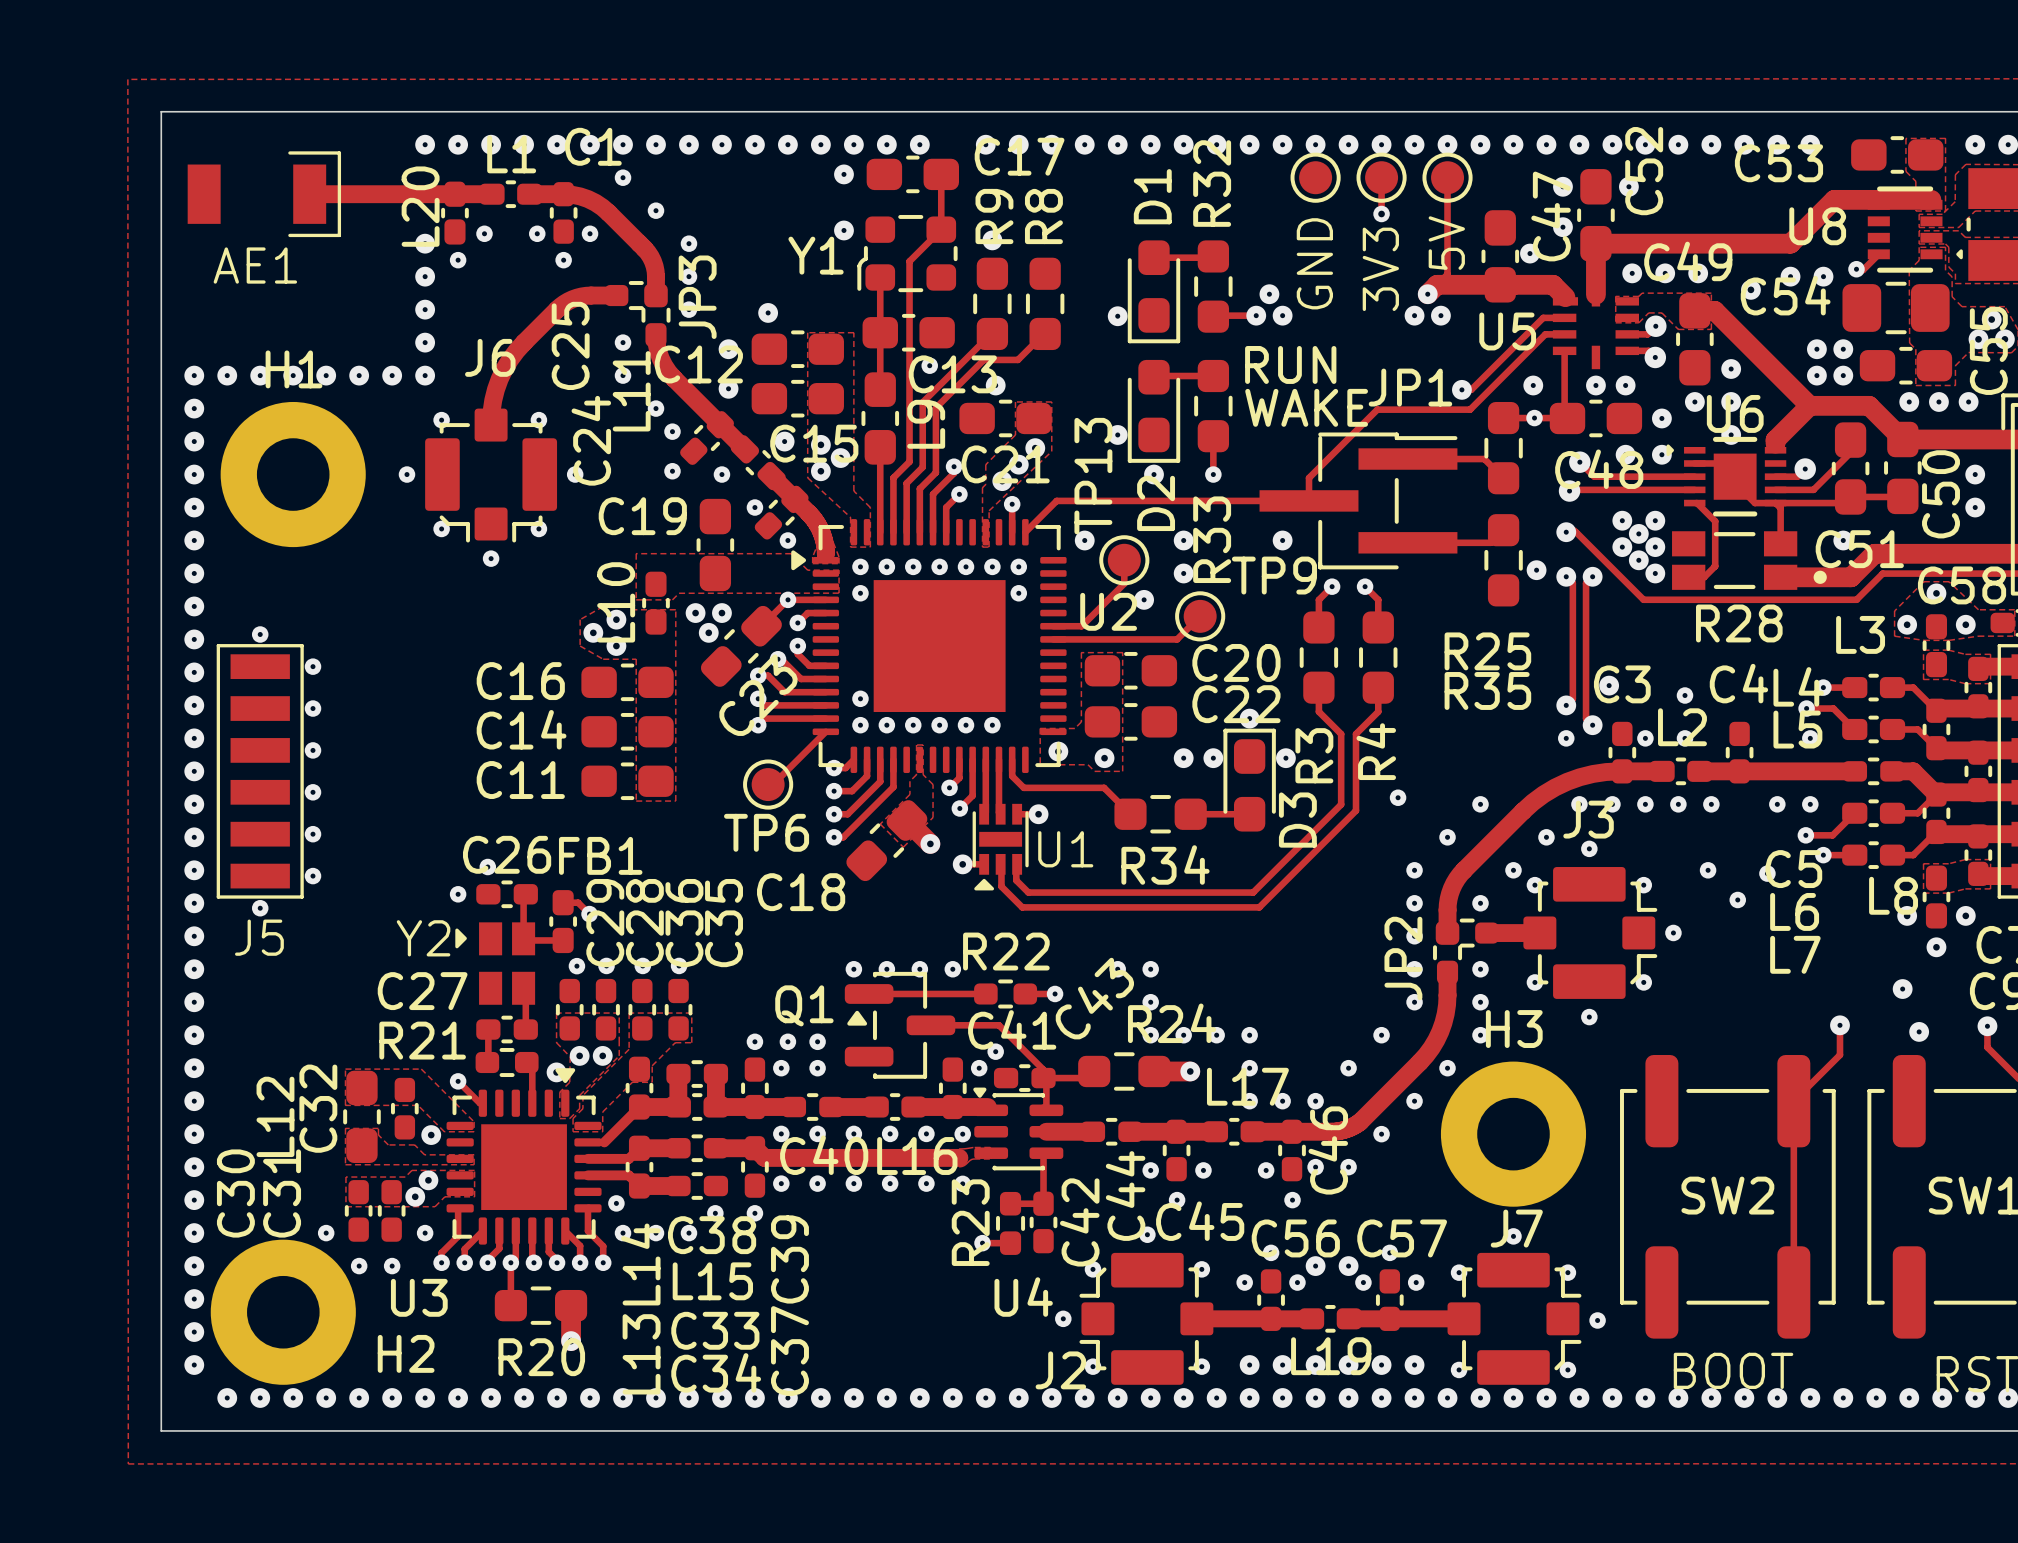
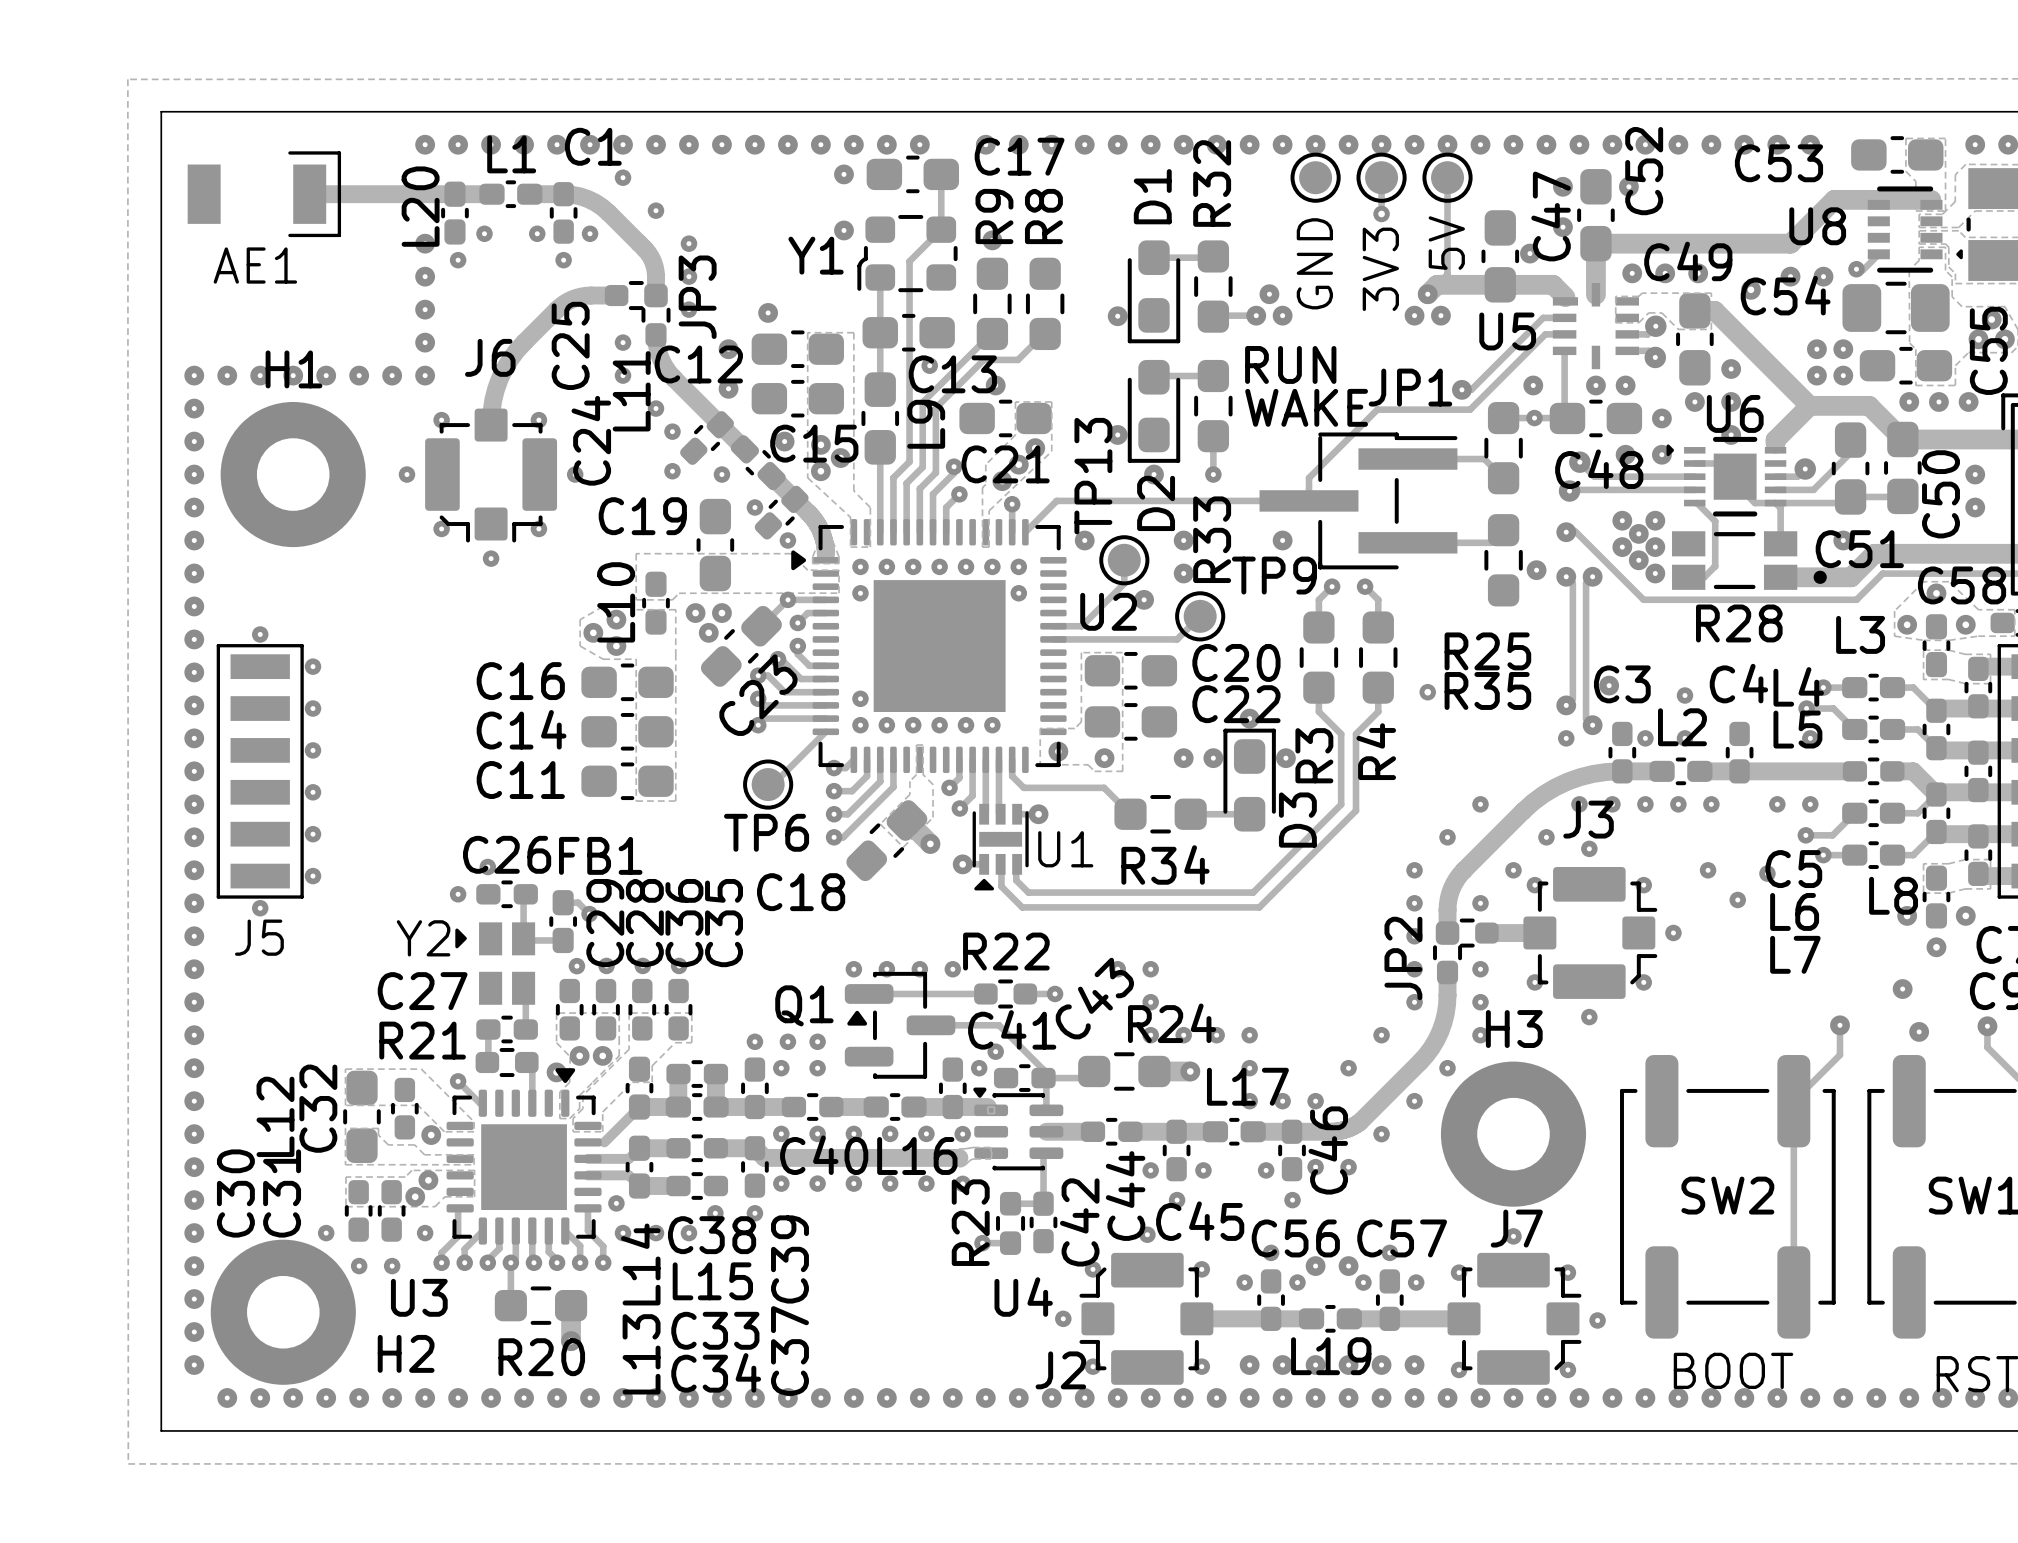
via: none -> (1427, 692)
via: (1398, 797) -> none

